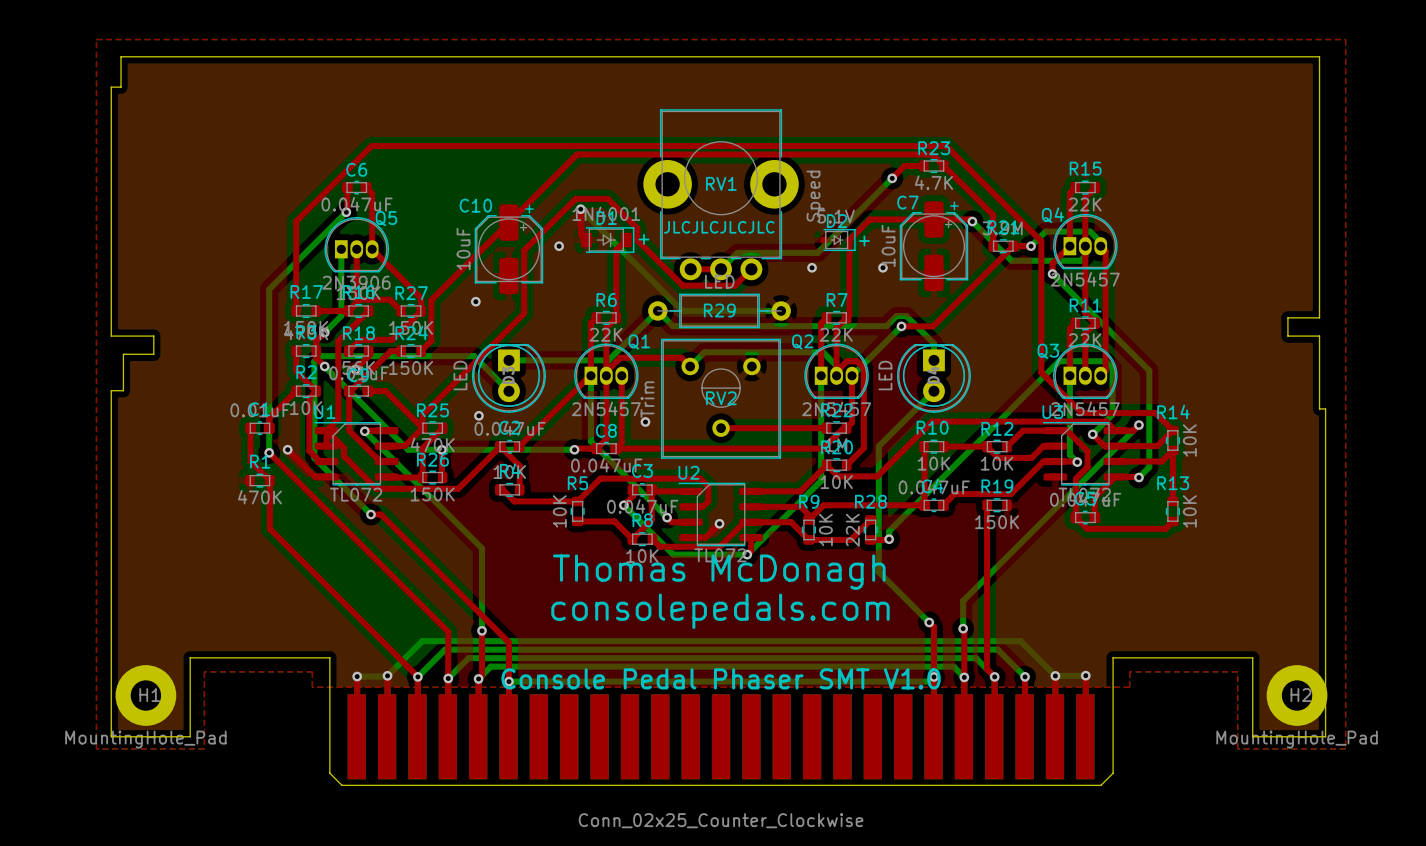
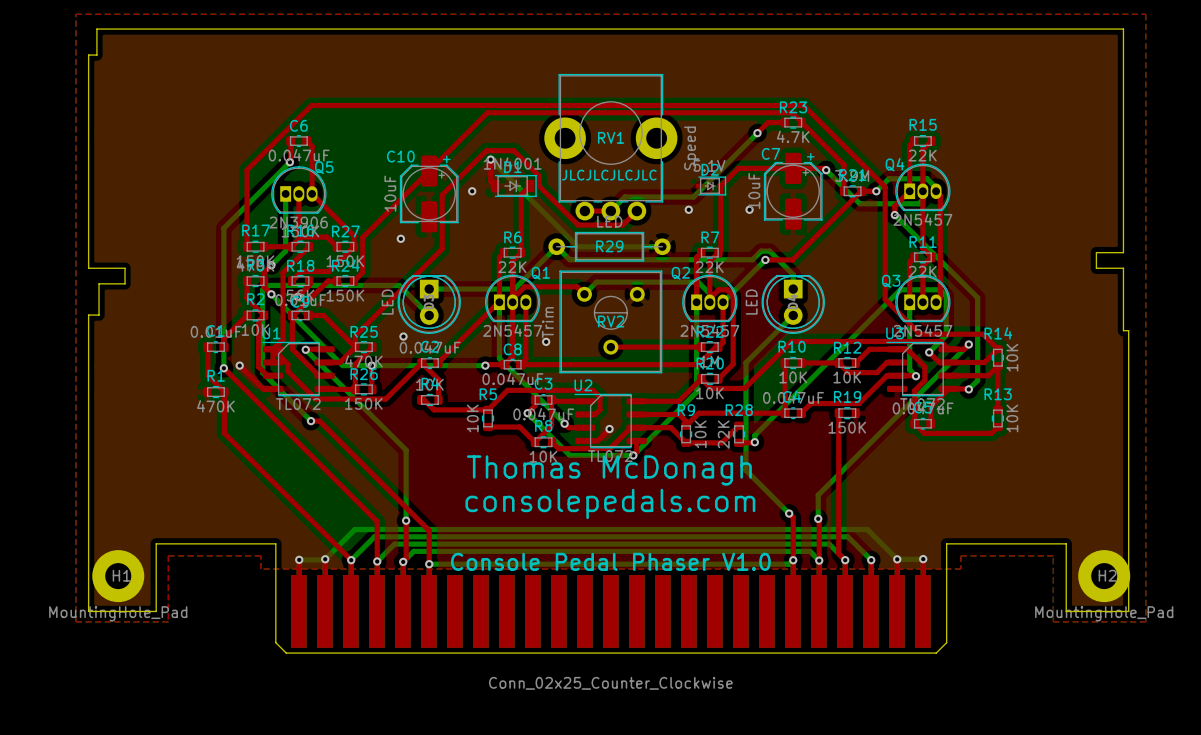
text: + (643, 239) -> none
text: + (864, 241) -> none
text: Console Pedal Phaser SMT V1.0 (721, 678) -> Console Pedal Phaser V1.0 (610, 561)

